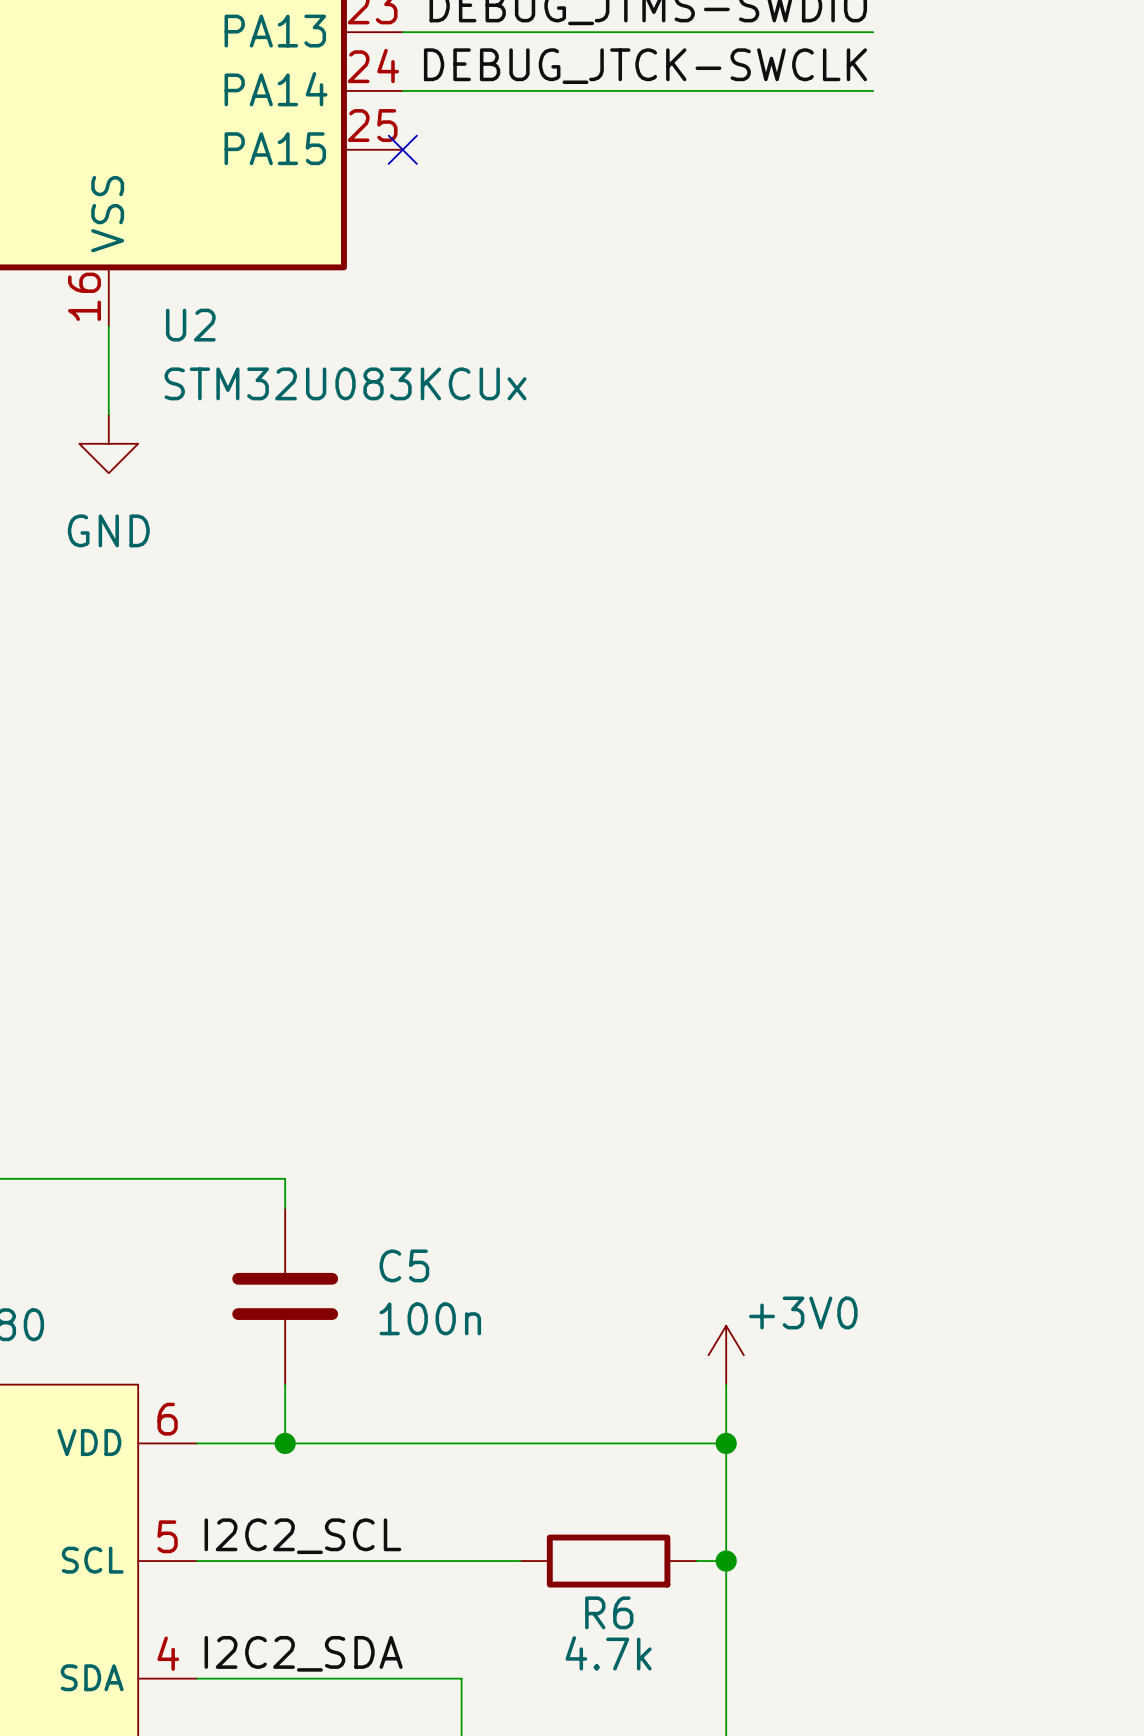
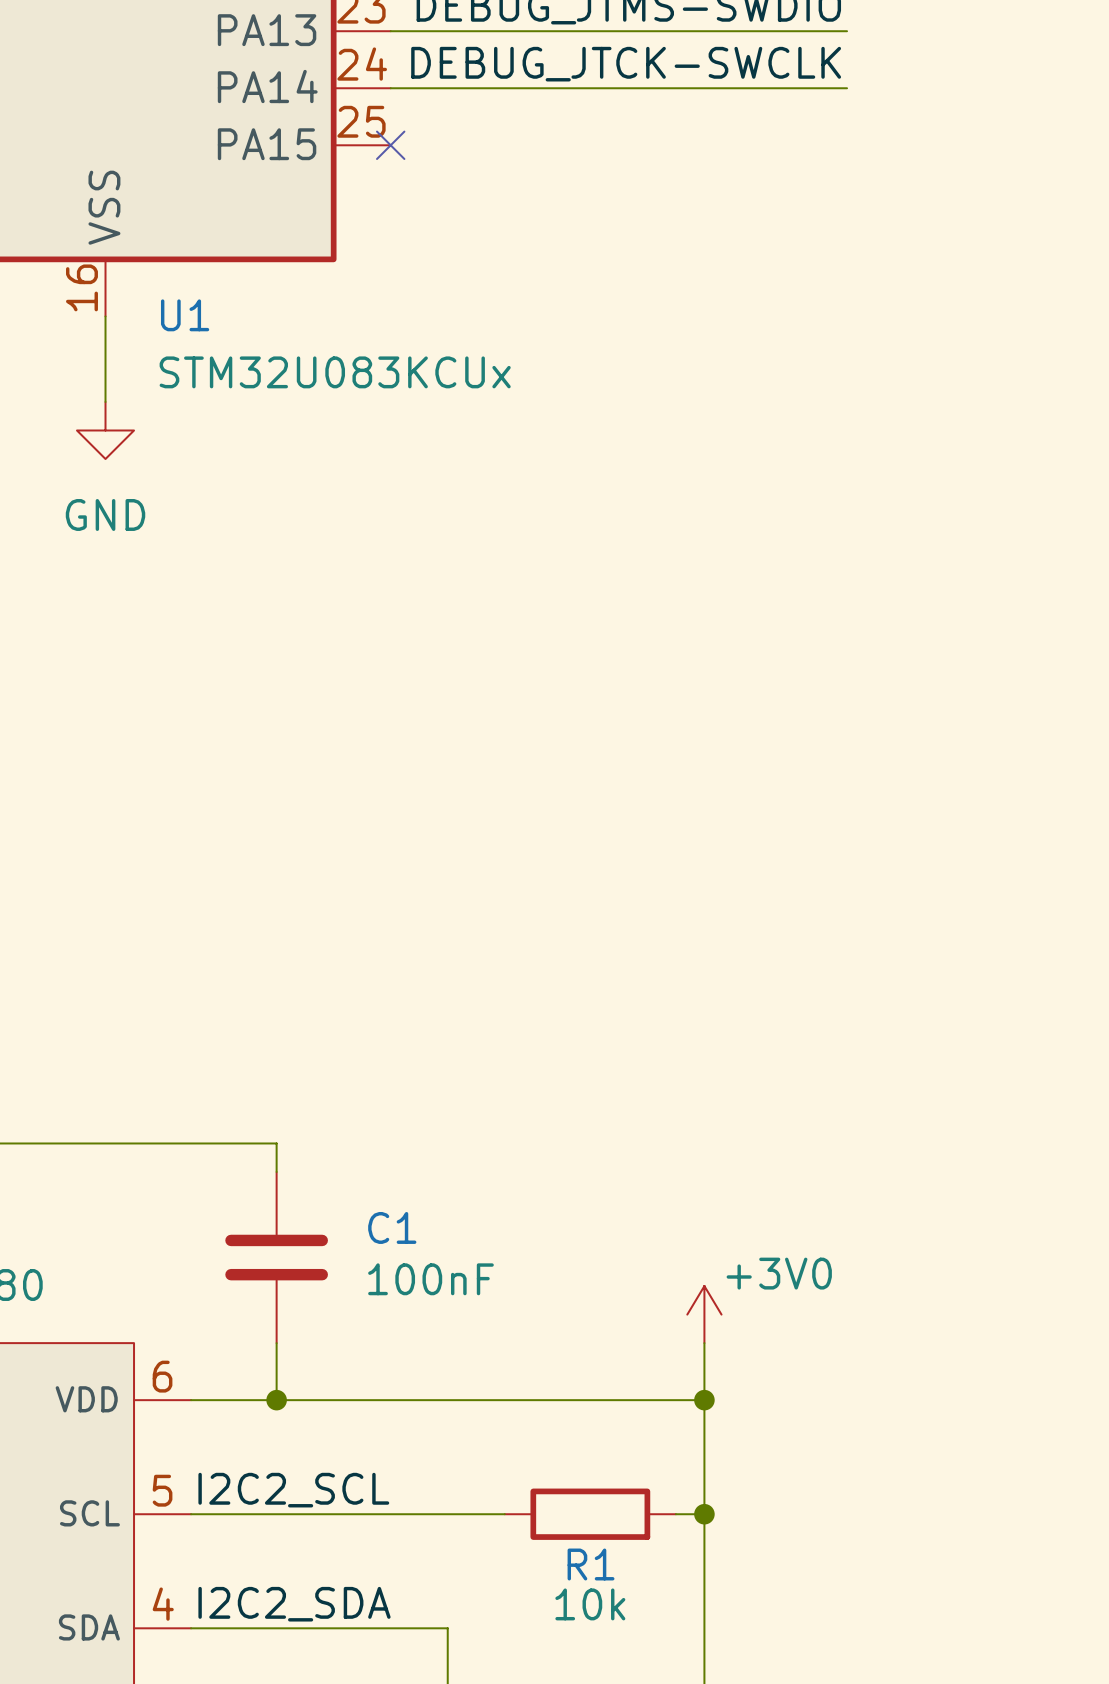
U2 name: U2 (190, 325) -> U1 (185, 315)
C5 name: C5 (404, 1265) -> C1 (392, 1227)
C5 value: 100n (430, 1318) -> 100nF (430, 1279)
R6 name: R6 (609, 1612) -> R1 (591, 1564)
R6 value: 4.7k (608, 1653) -> 10k (590, 1604)

